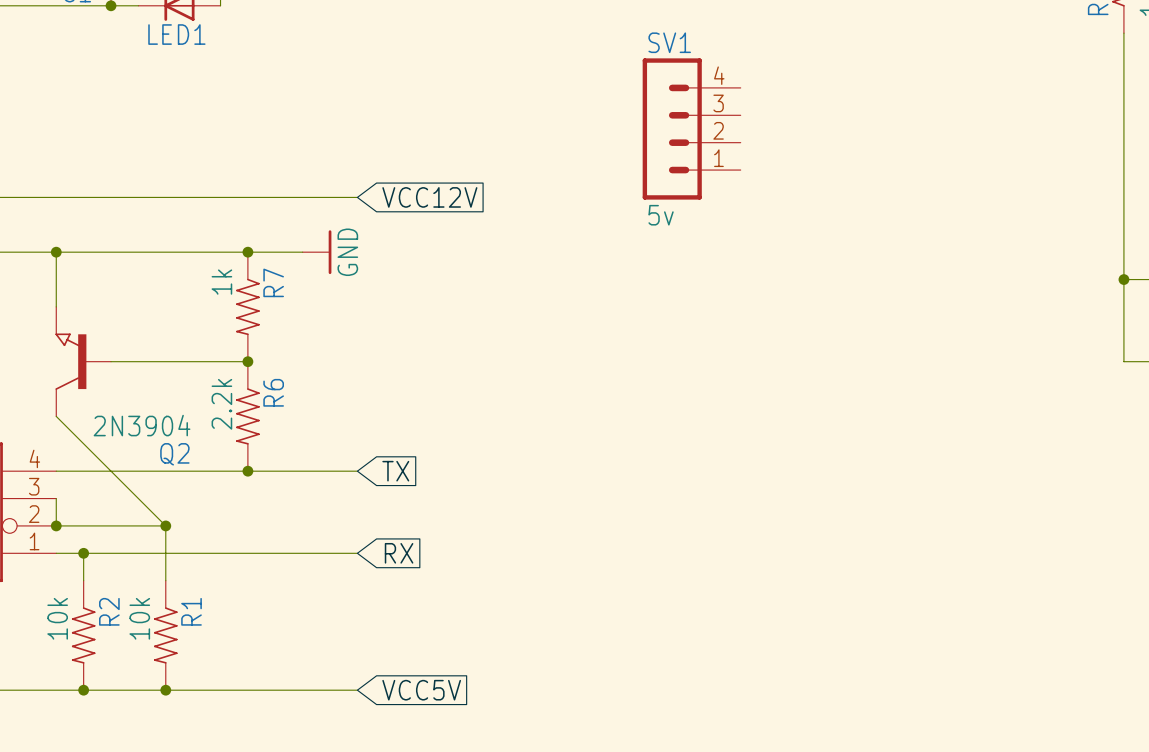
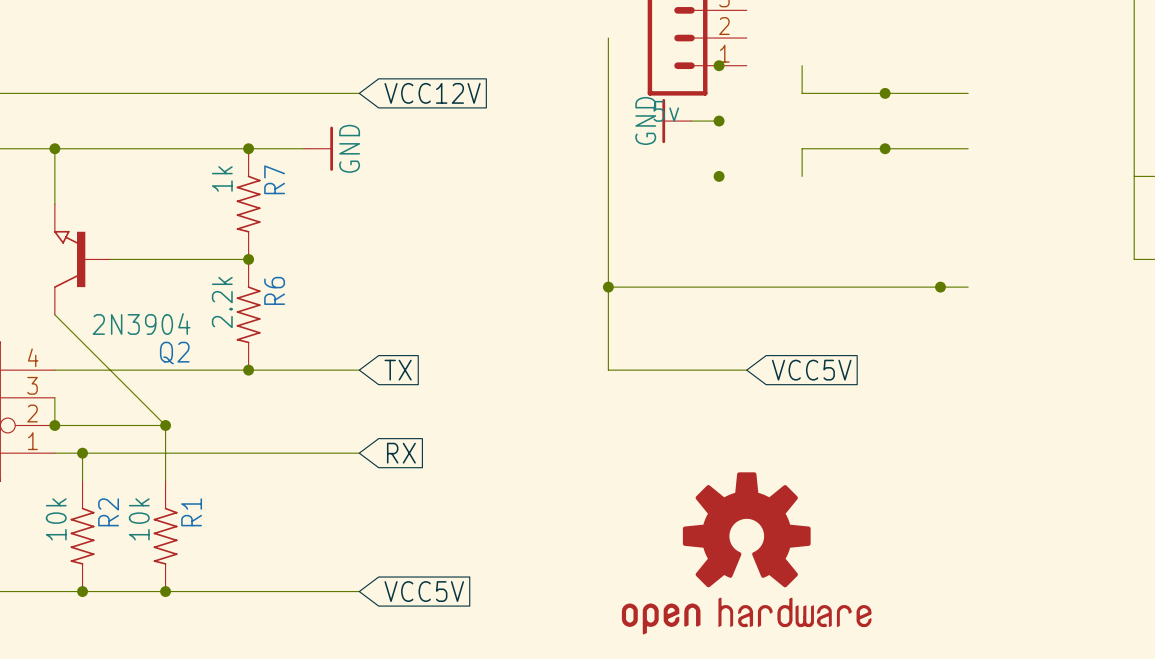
wire: none -> (608, 38) (608, 370) (746, 370)
junction: none -> (719, 65)
wire: none -> (802, 65) (802, 93) (968, 93)
junction: none -> (885, 93)
power symbol: none -> GND (676, 121)
wire: none -> (691, 121) (719, 121)
junction: none -> (719, 121)
junction: none -> (885, 148)
wire: none -> (968, 148) (802, 148) (802, 176)
junction: none -> (719, 176)
junction: (1123, 279) -> none
wire: none -> (608, 287) (968, 287)
junction: none -> (608, 287)
junction: none -> (940, 287)
global label: none -> VCC5V (811, 370)
part: none -> (746, 553)

